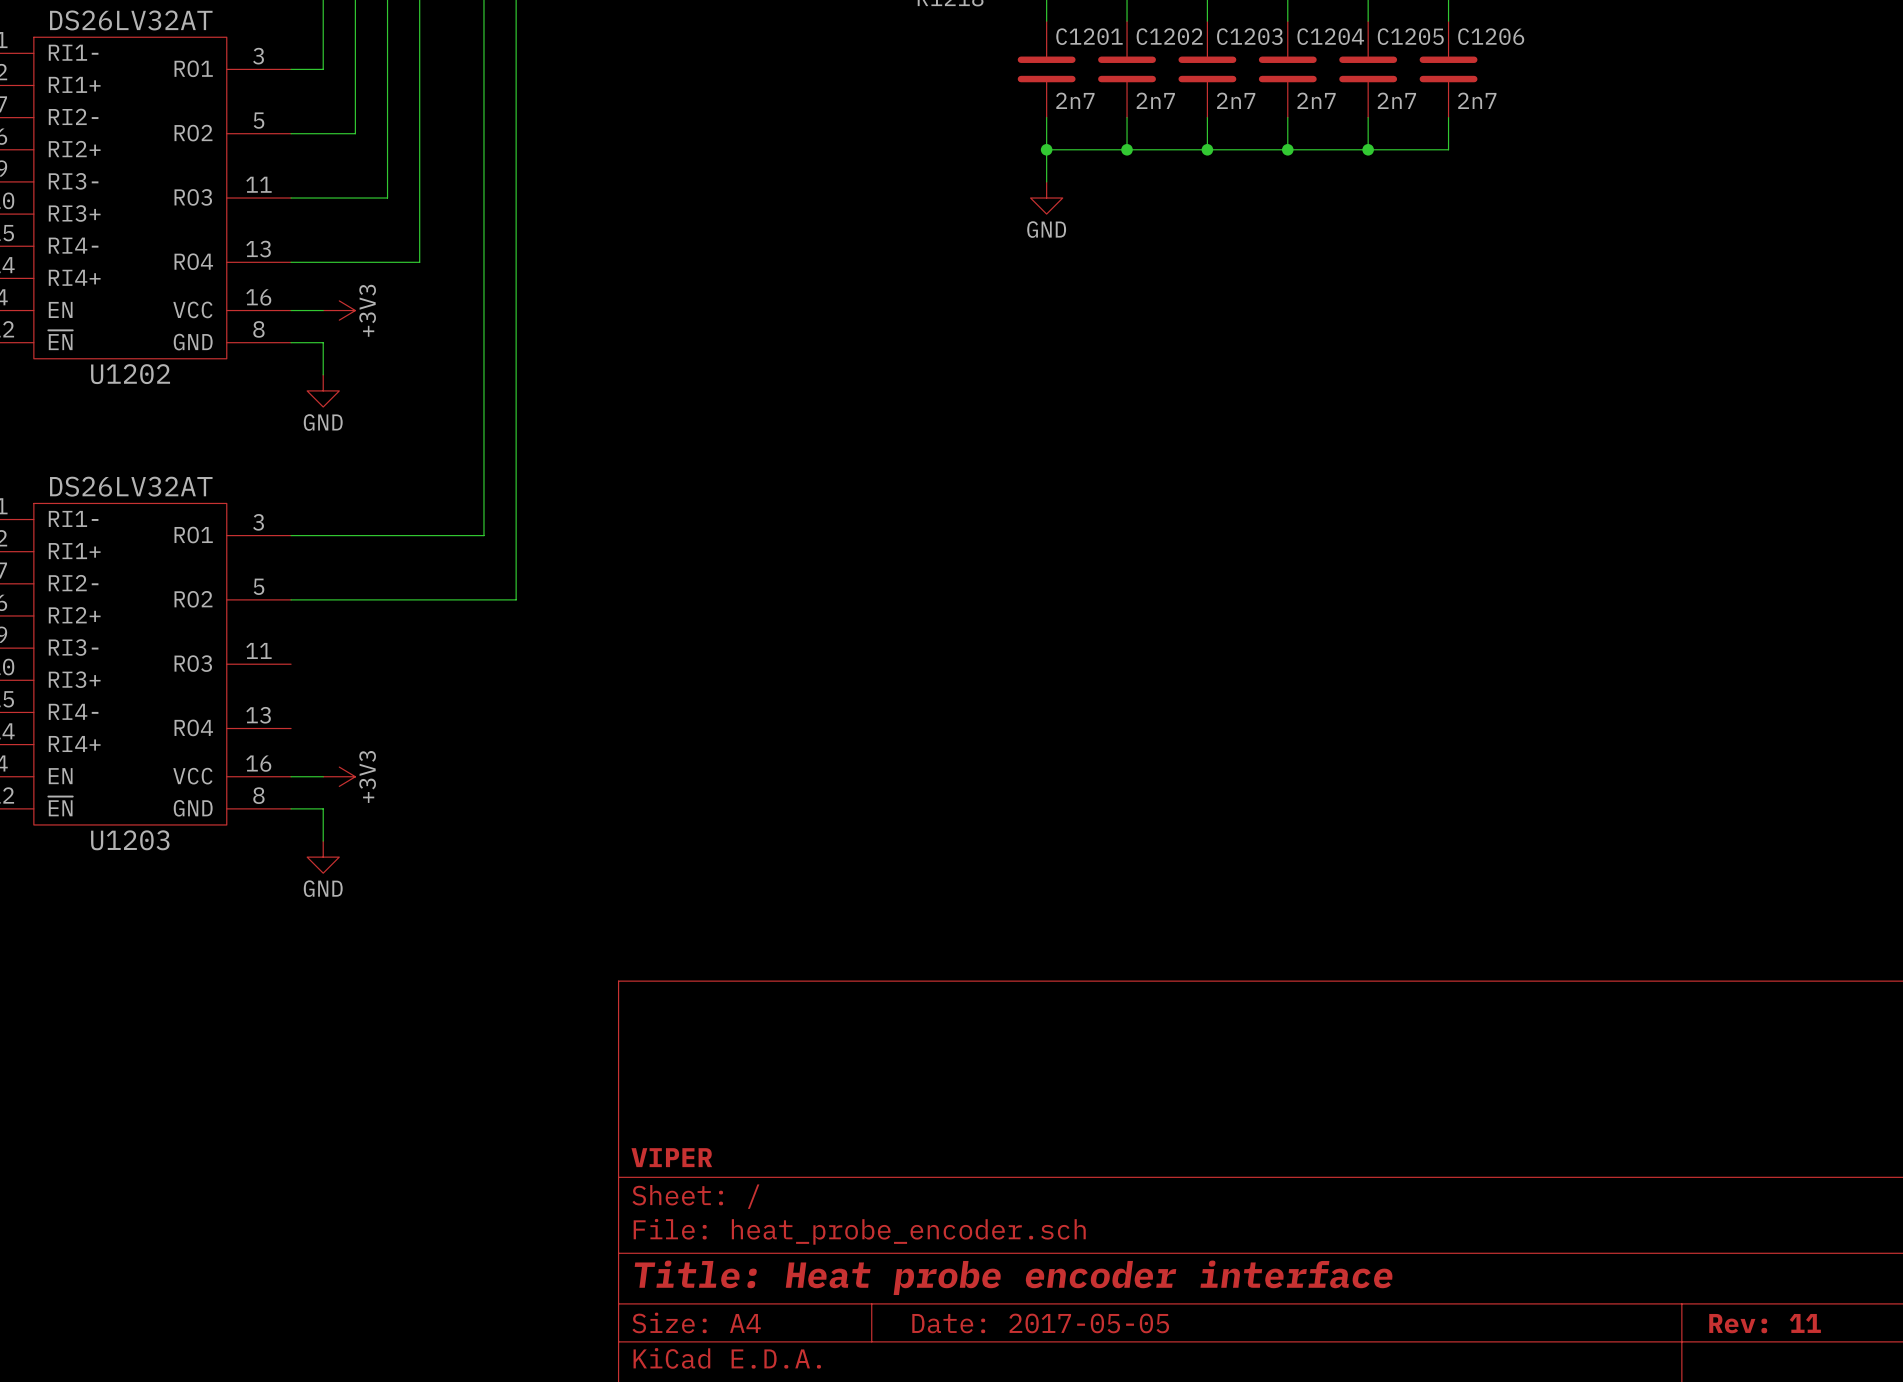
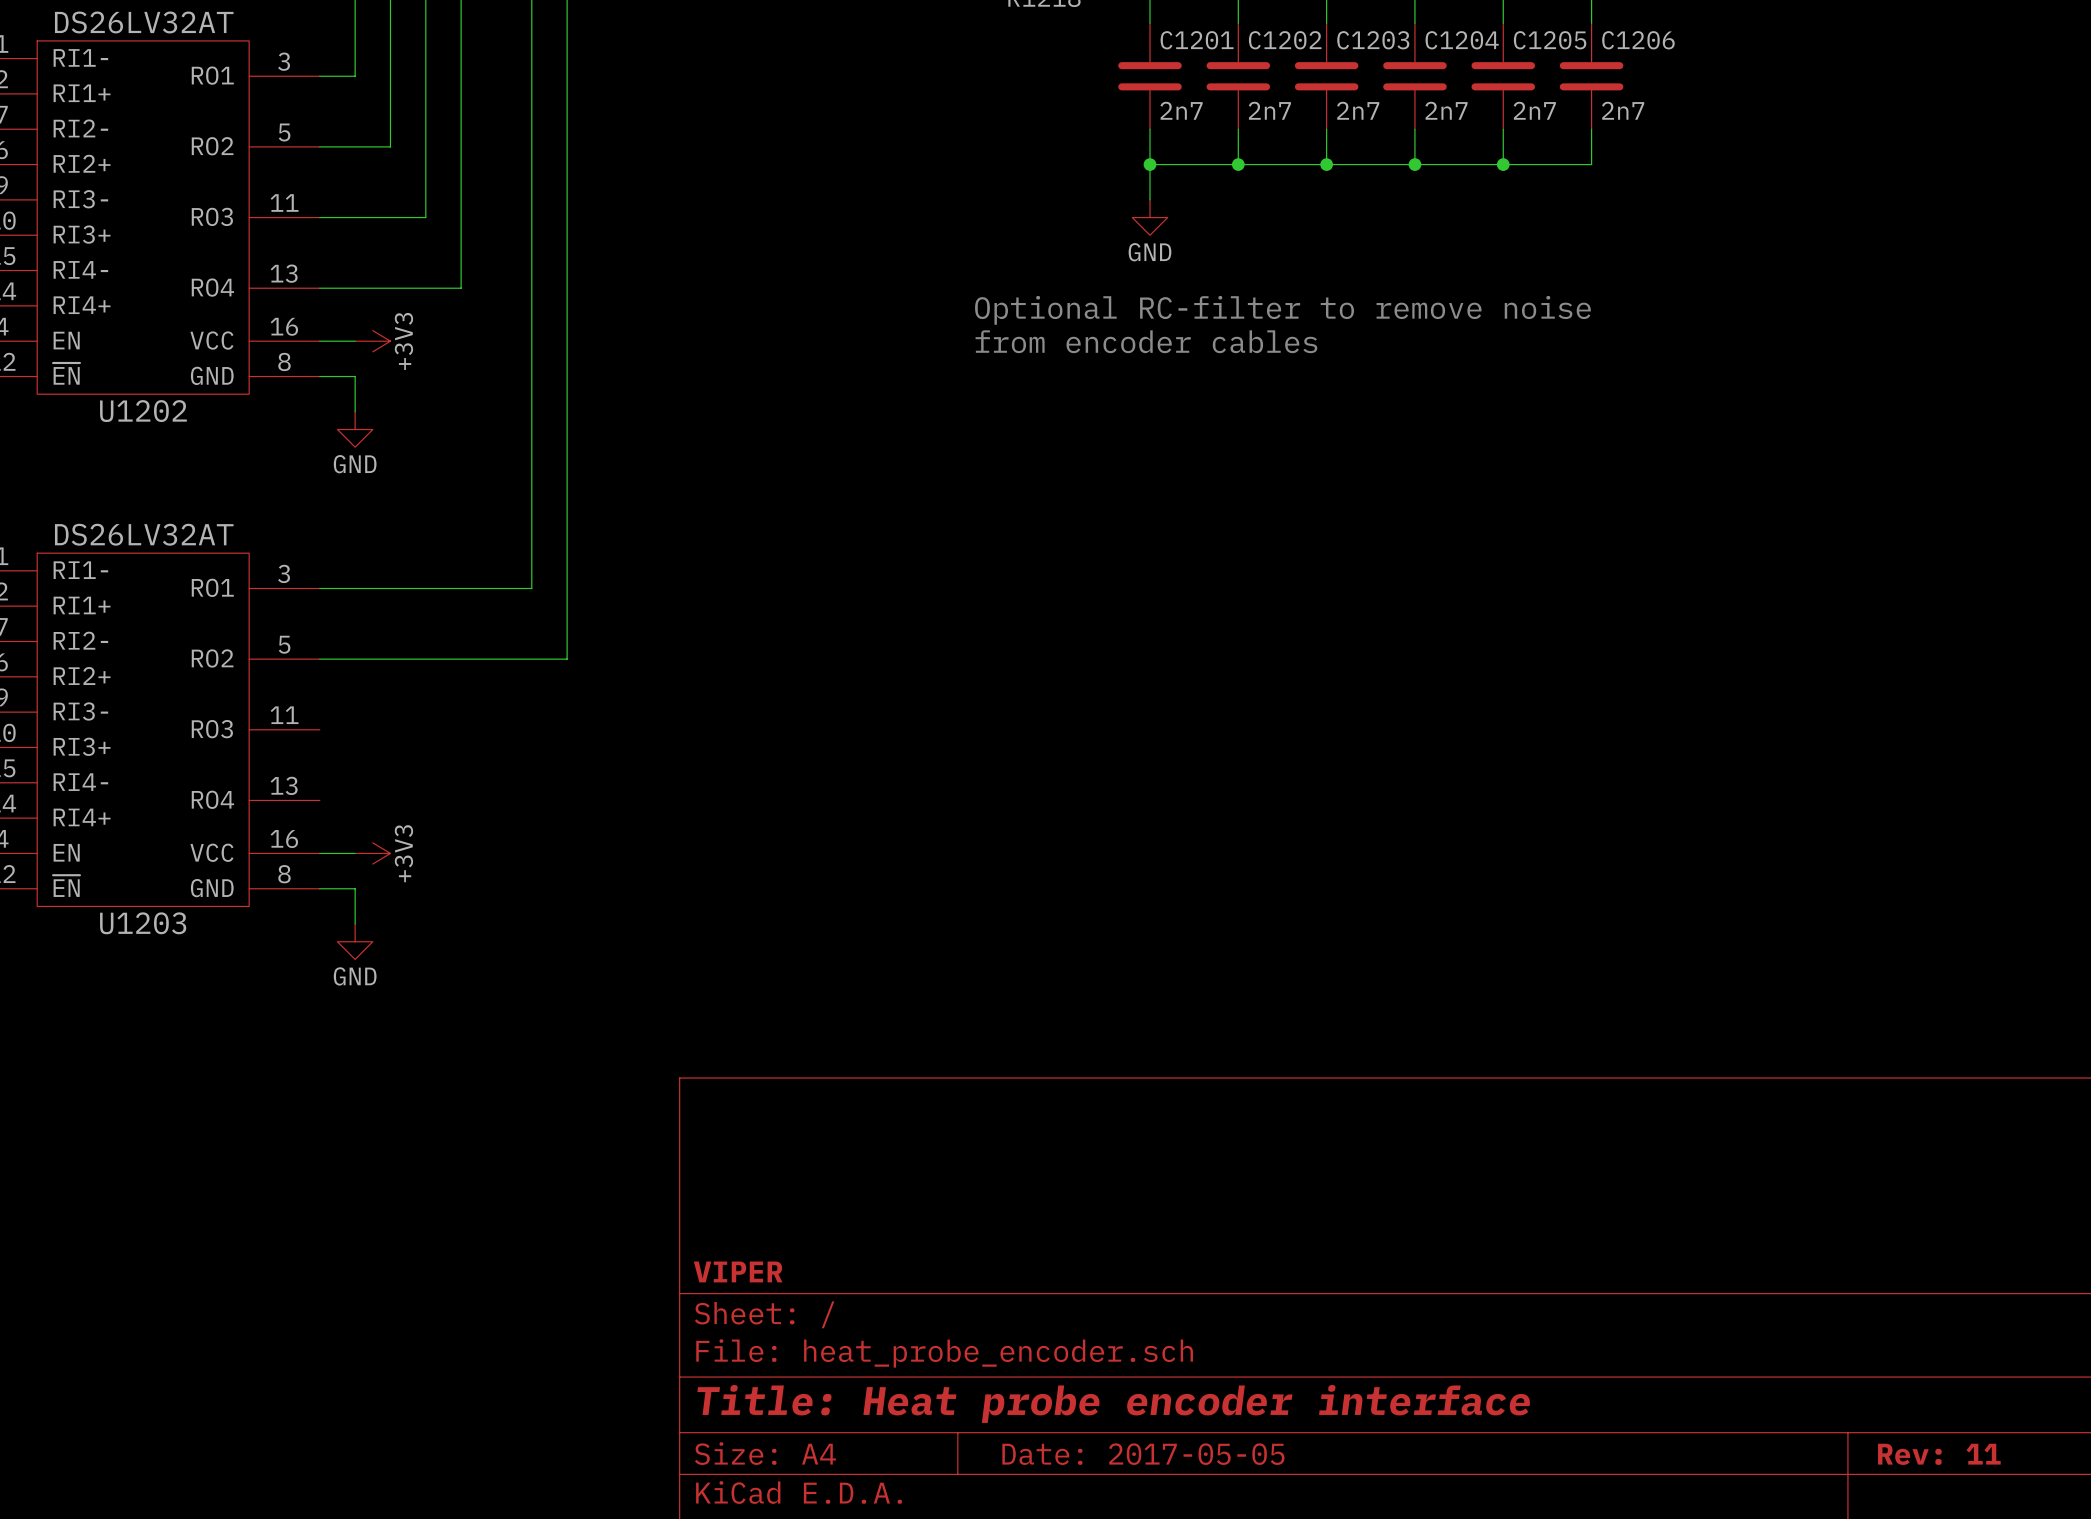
text: none -> Optional RC-filter to remove noise (1282, 310)
text: none -> from encoder cables (1146, 341)

